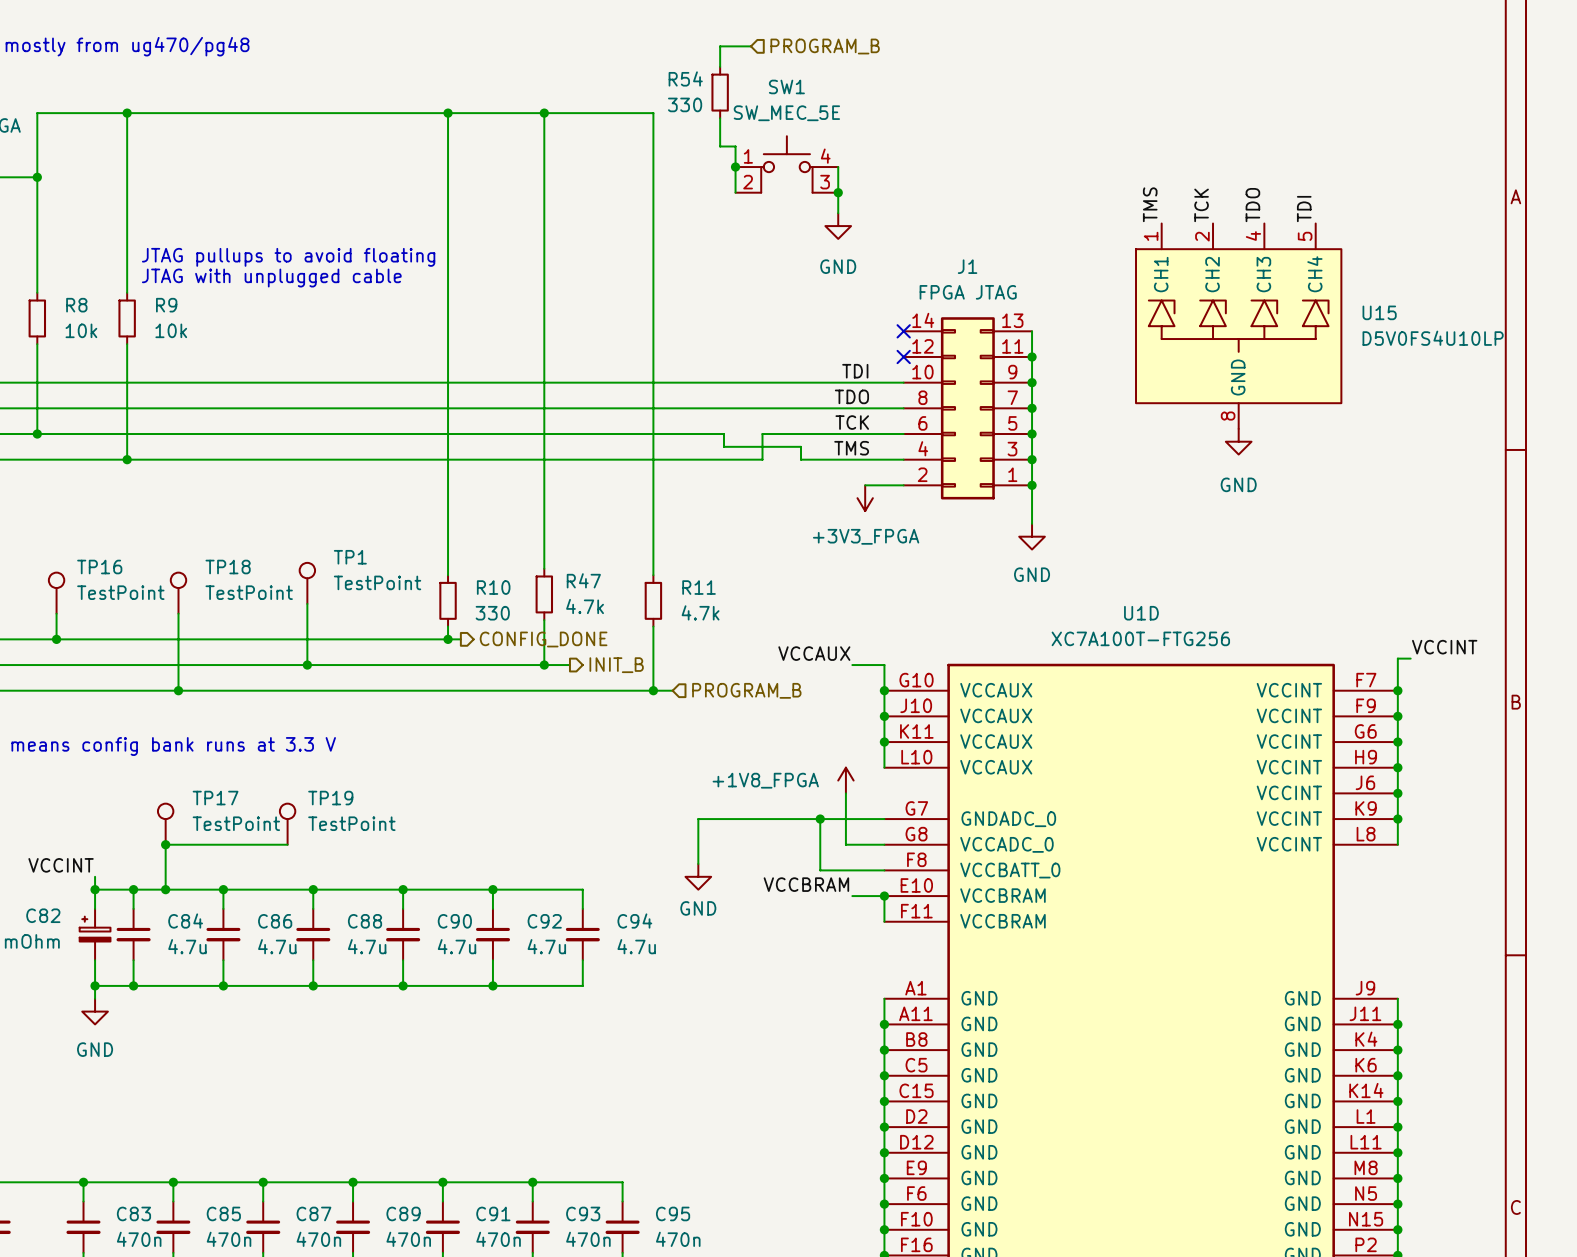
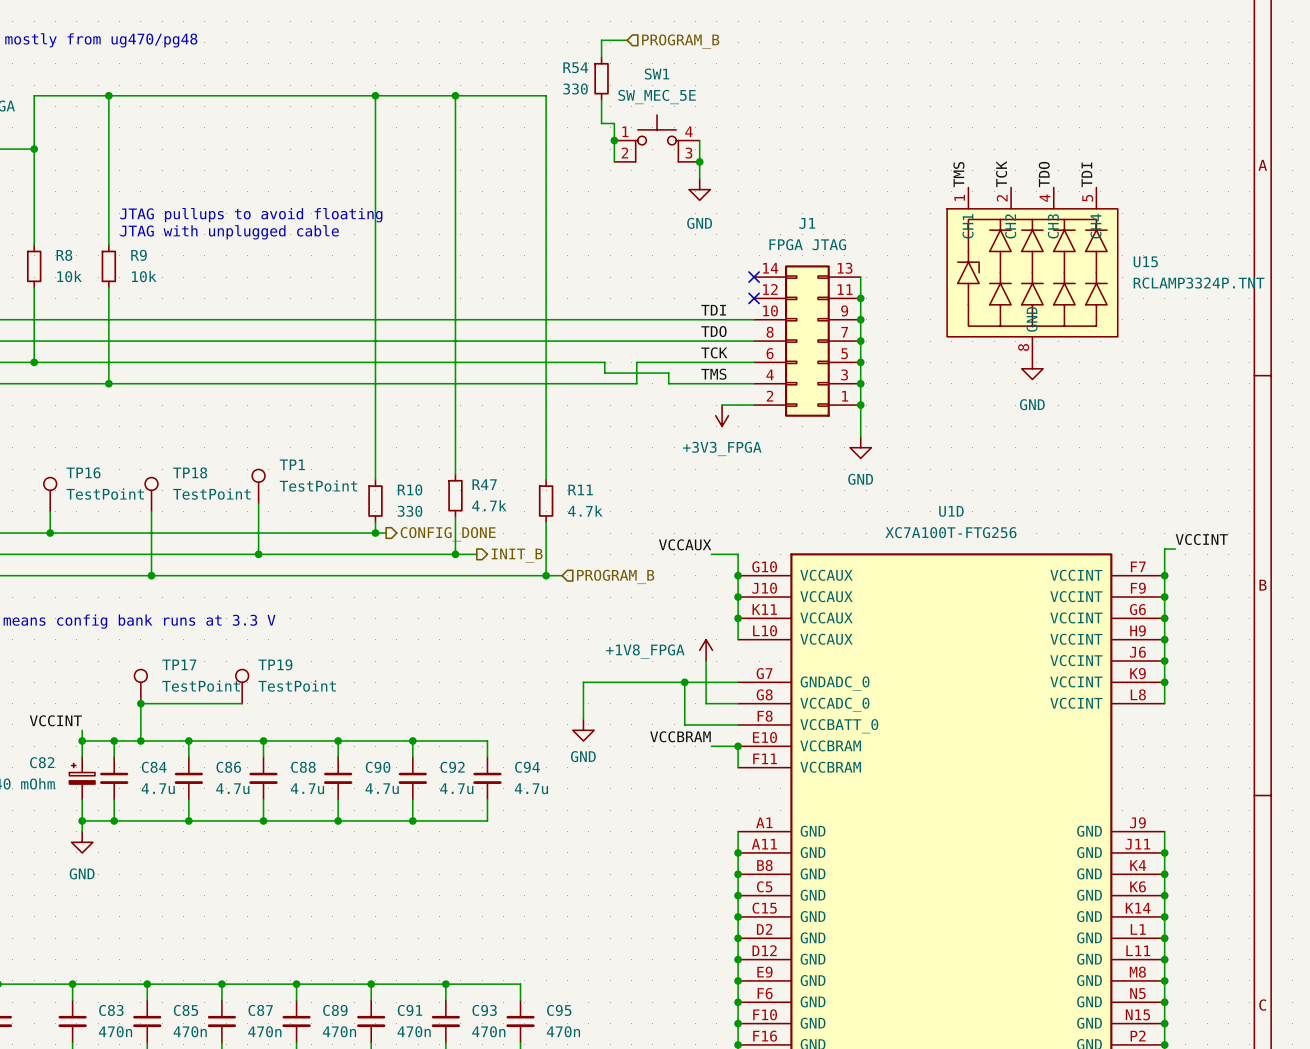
U15 symbol: [1136, 223, 1342, 429] -> [947, 187, 1118, 359]
U15 value: D5V0FS4U10LP (1433, 338) -> RCLAMP3324P.TNT (1199, 283)

